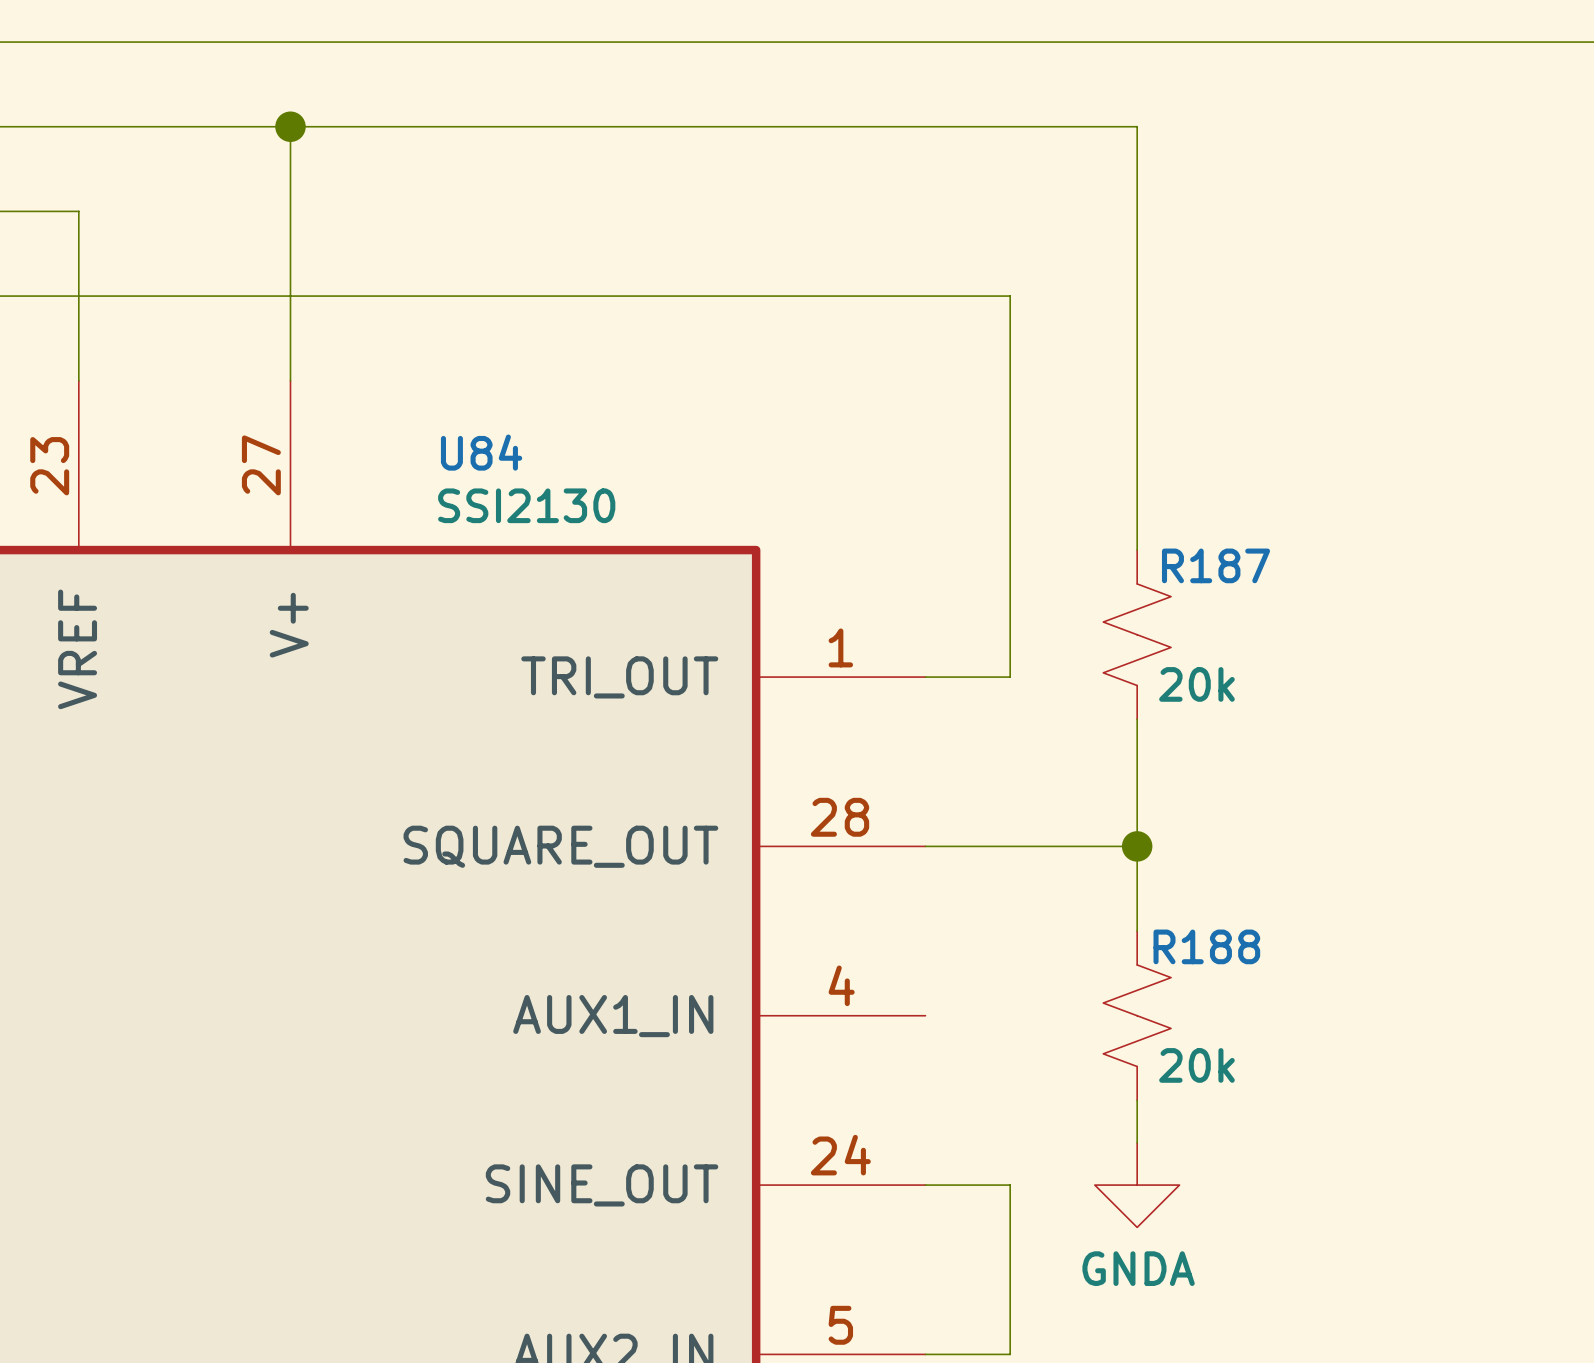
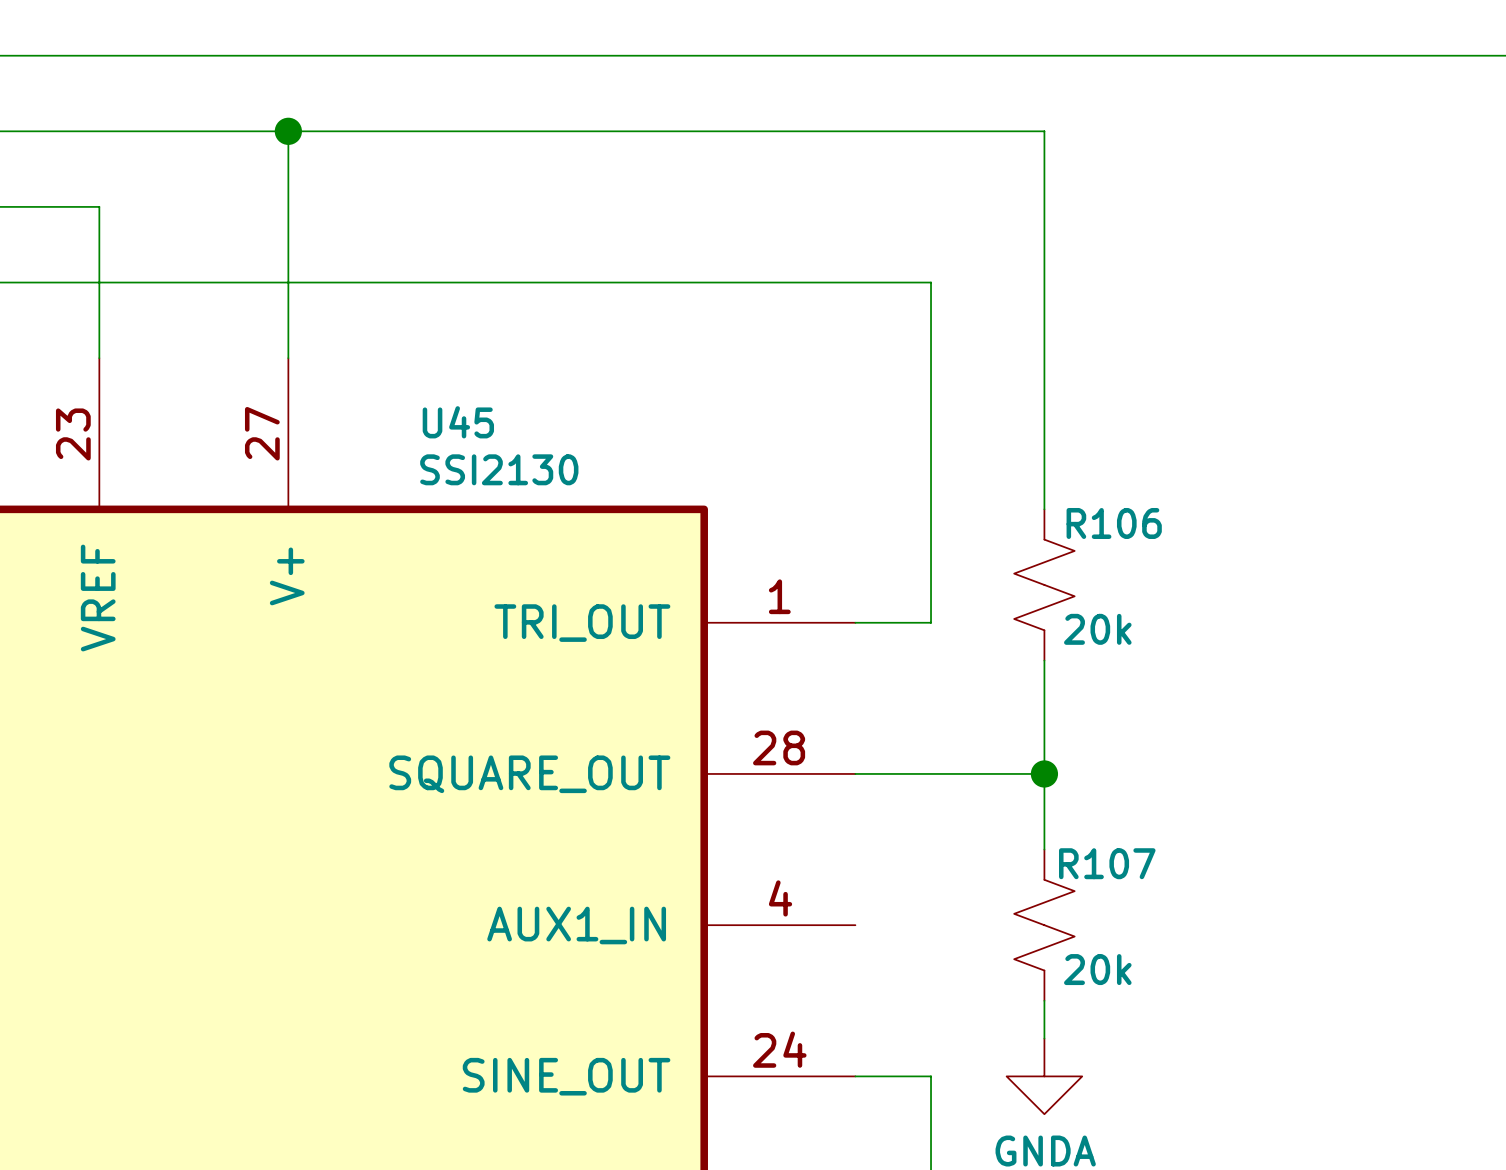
U84 name: U84 (481, 452) -> U45 (458, 422)
R187 name: R187 (1216, 565) -> R106 (1114, 523)
R188 name: R188 (1206, 946) -> R107 (1107, 863)

